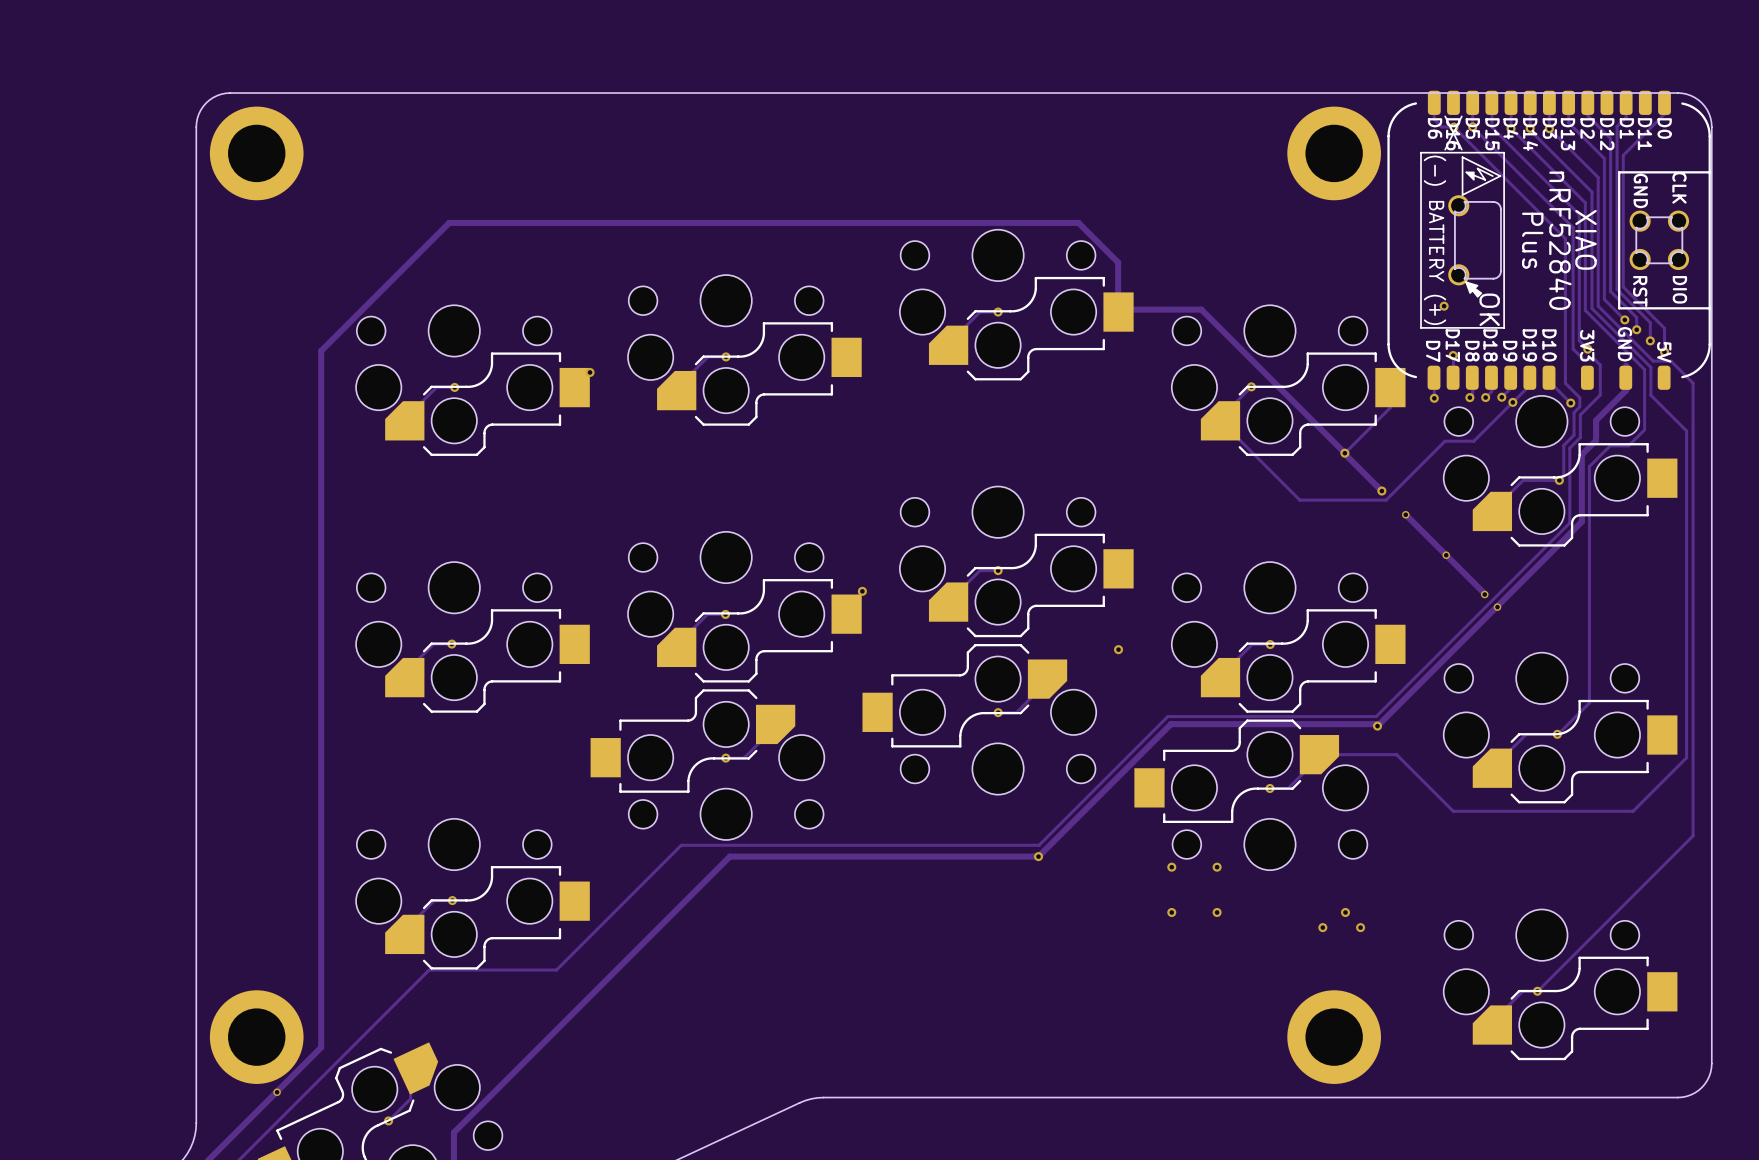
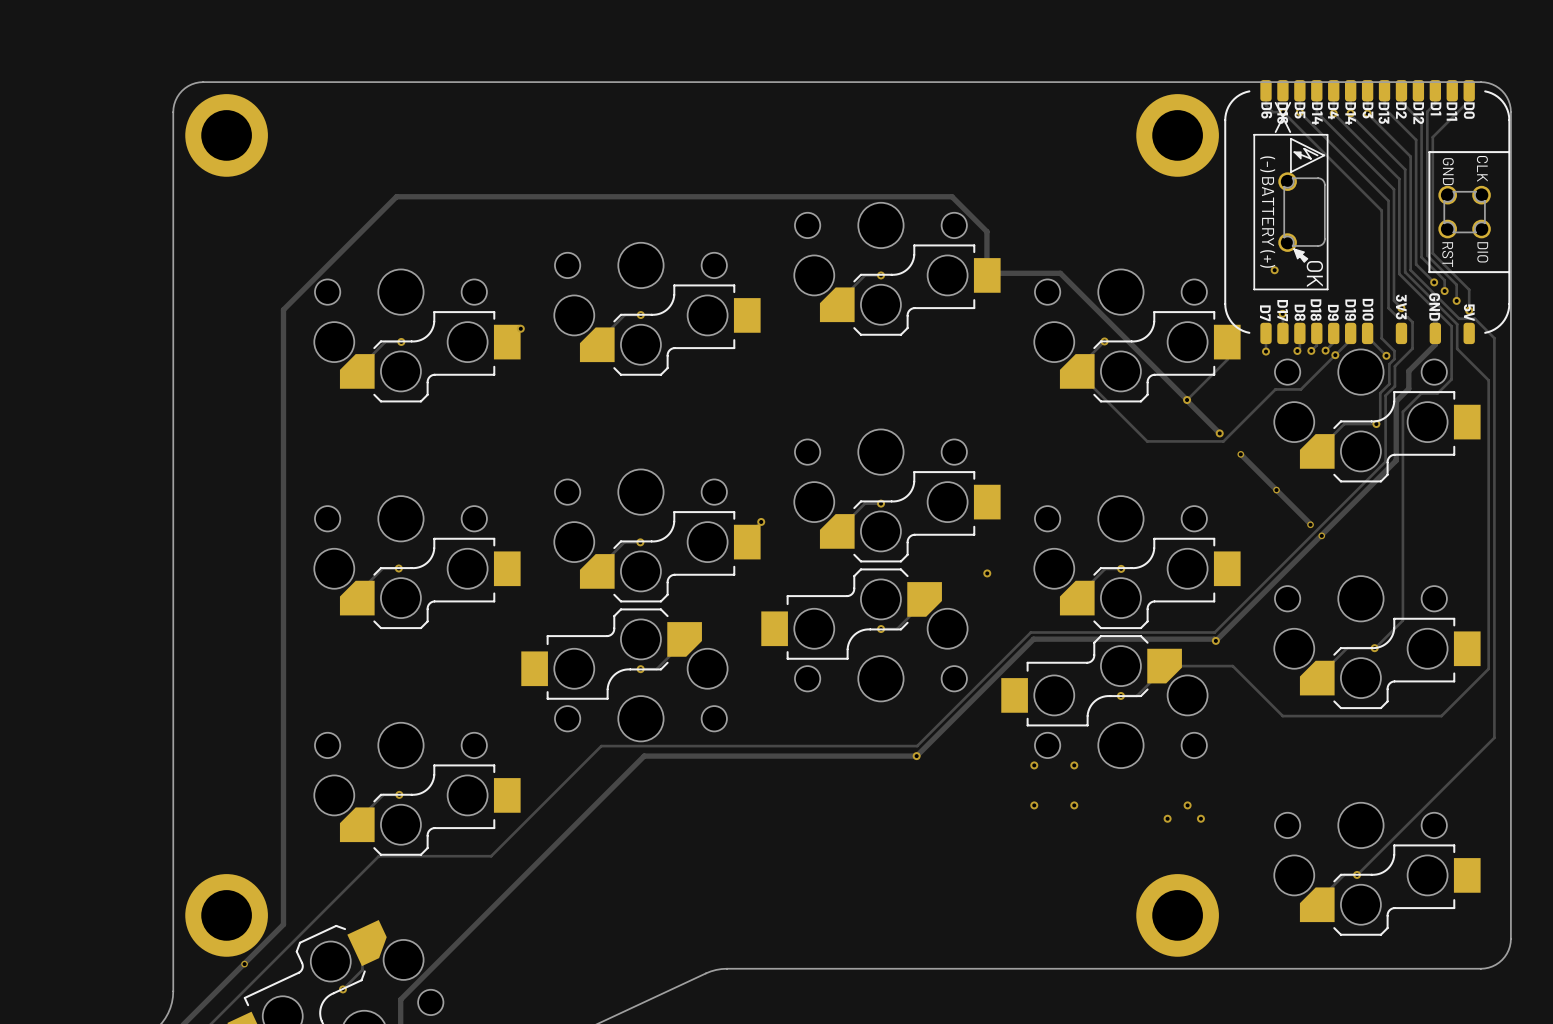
part footprint: [1387, 90, 1711, 390] -> [1224, 80, 1511, 345]

